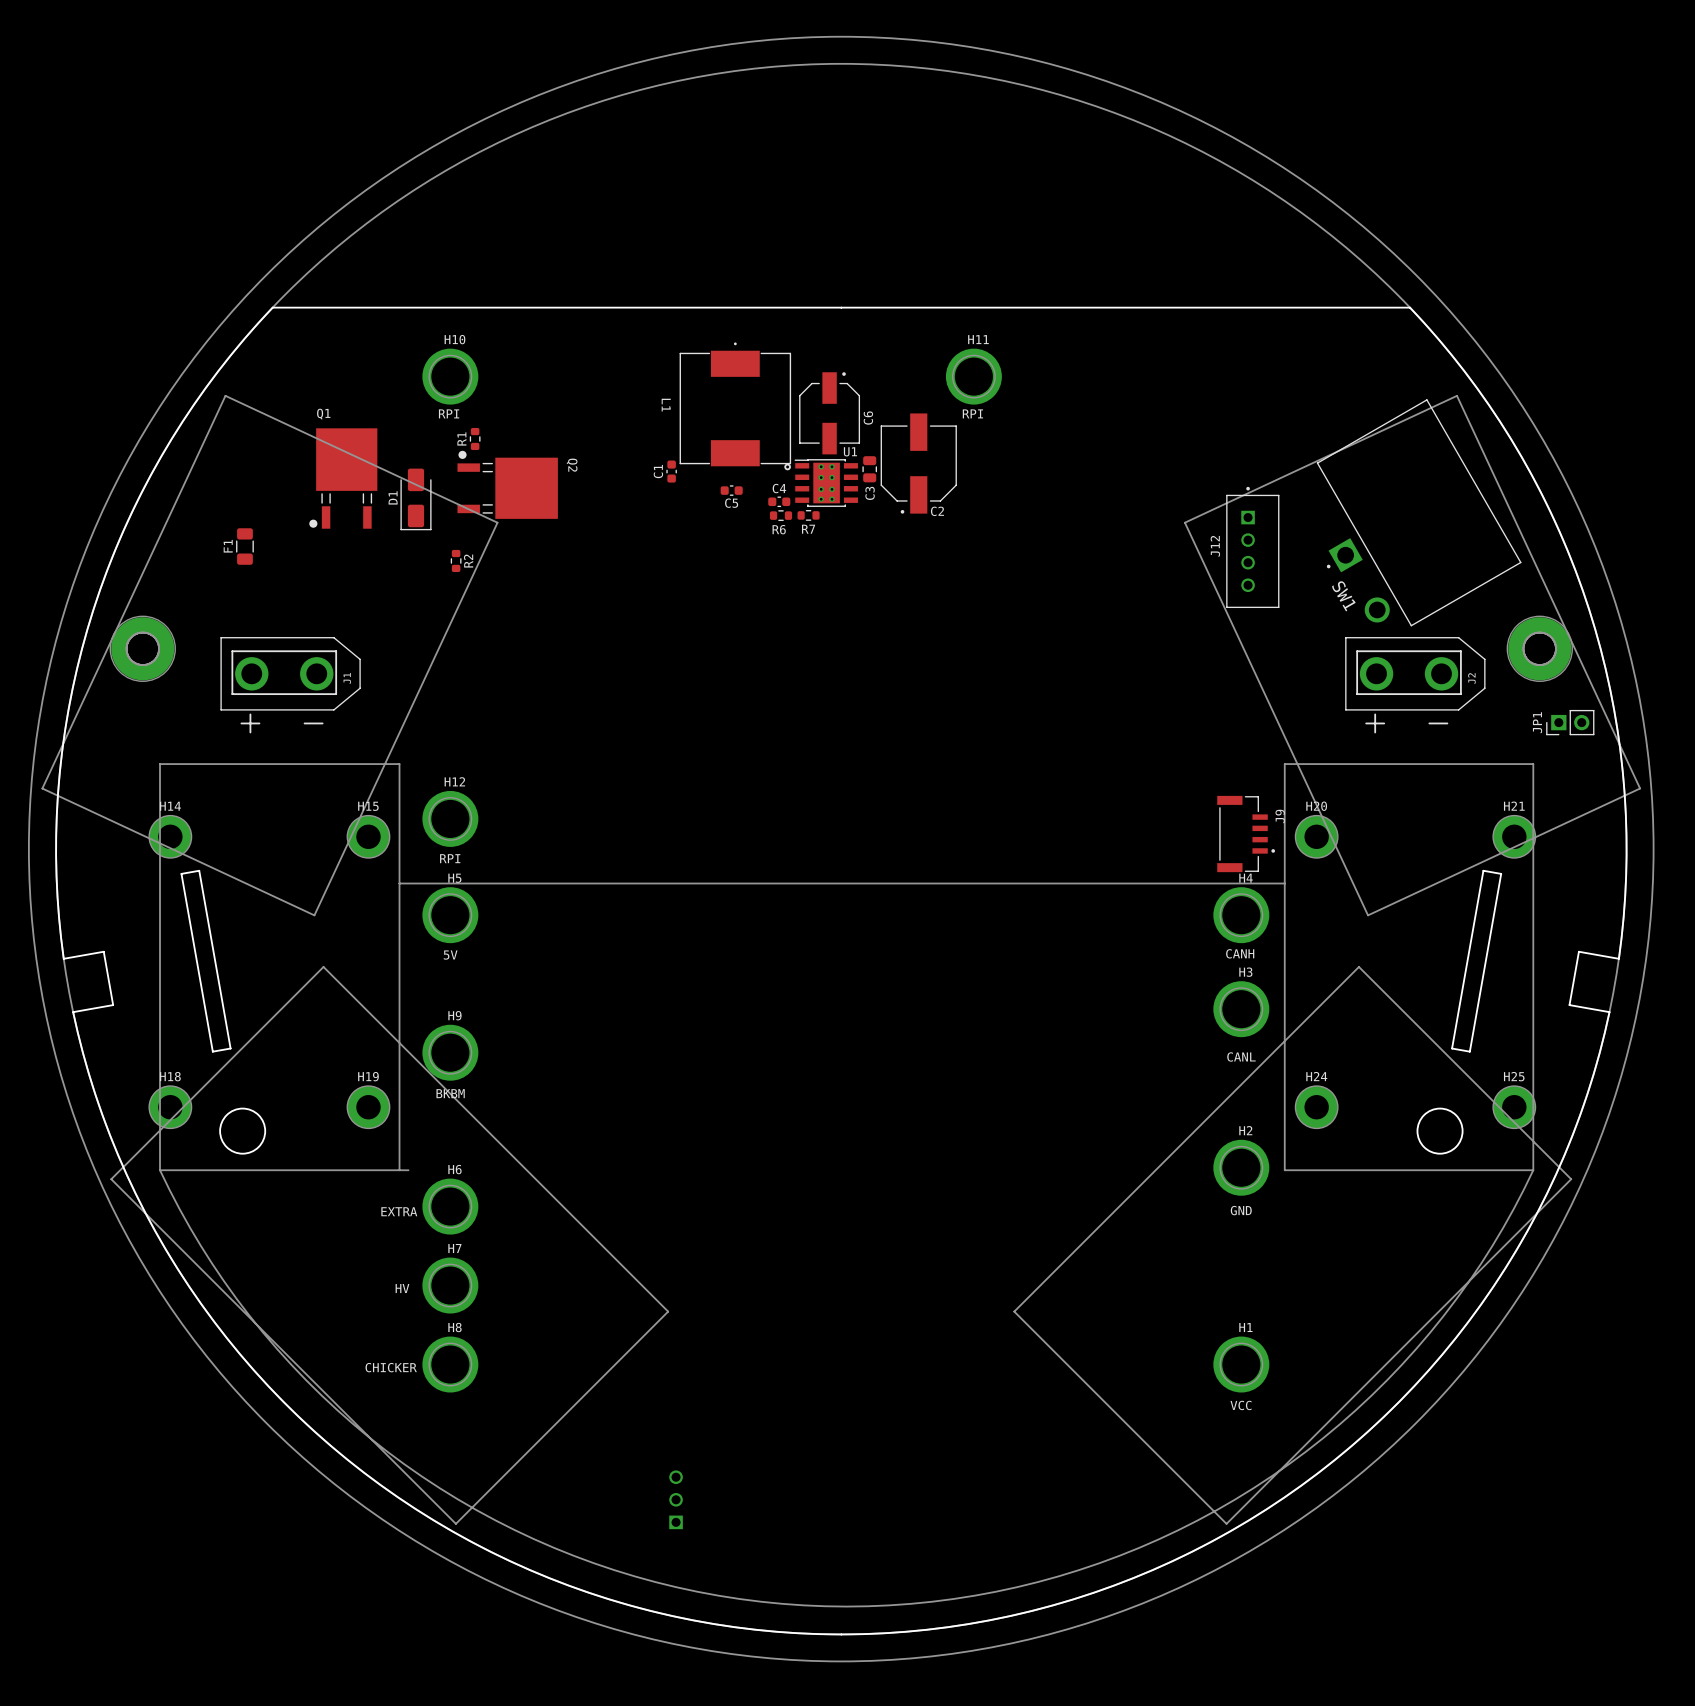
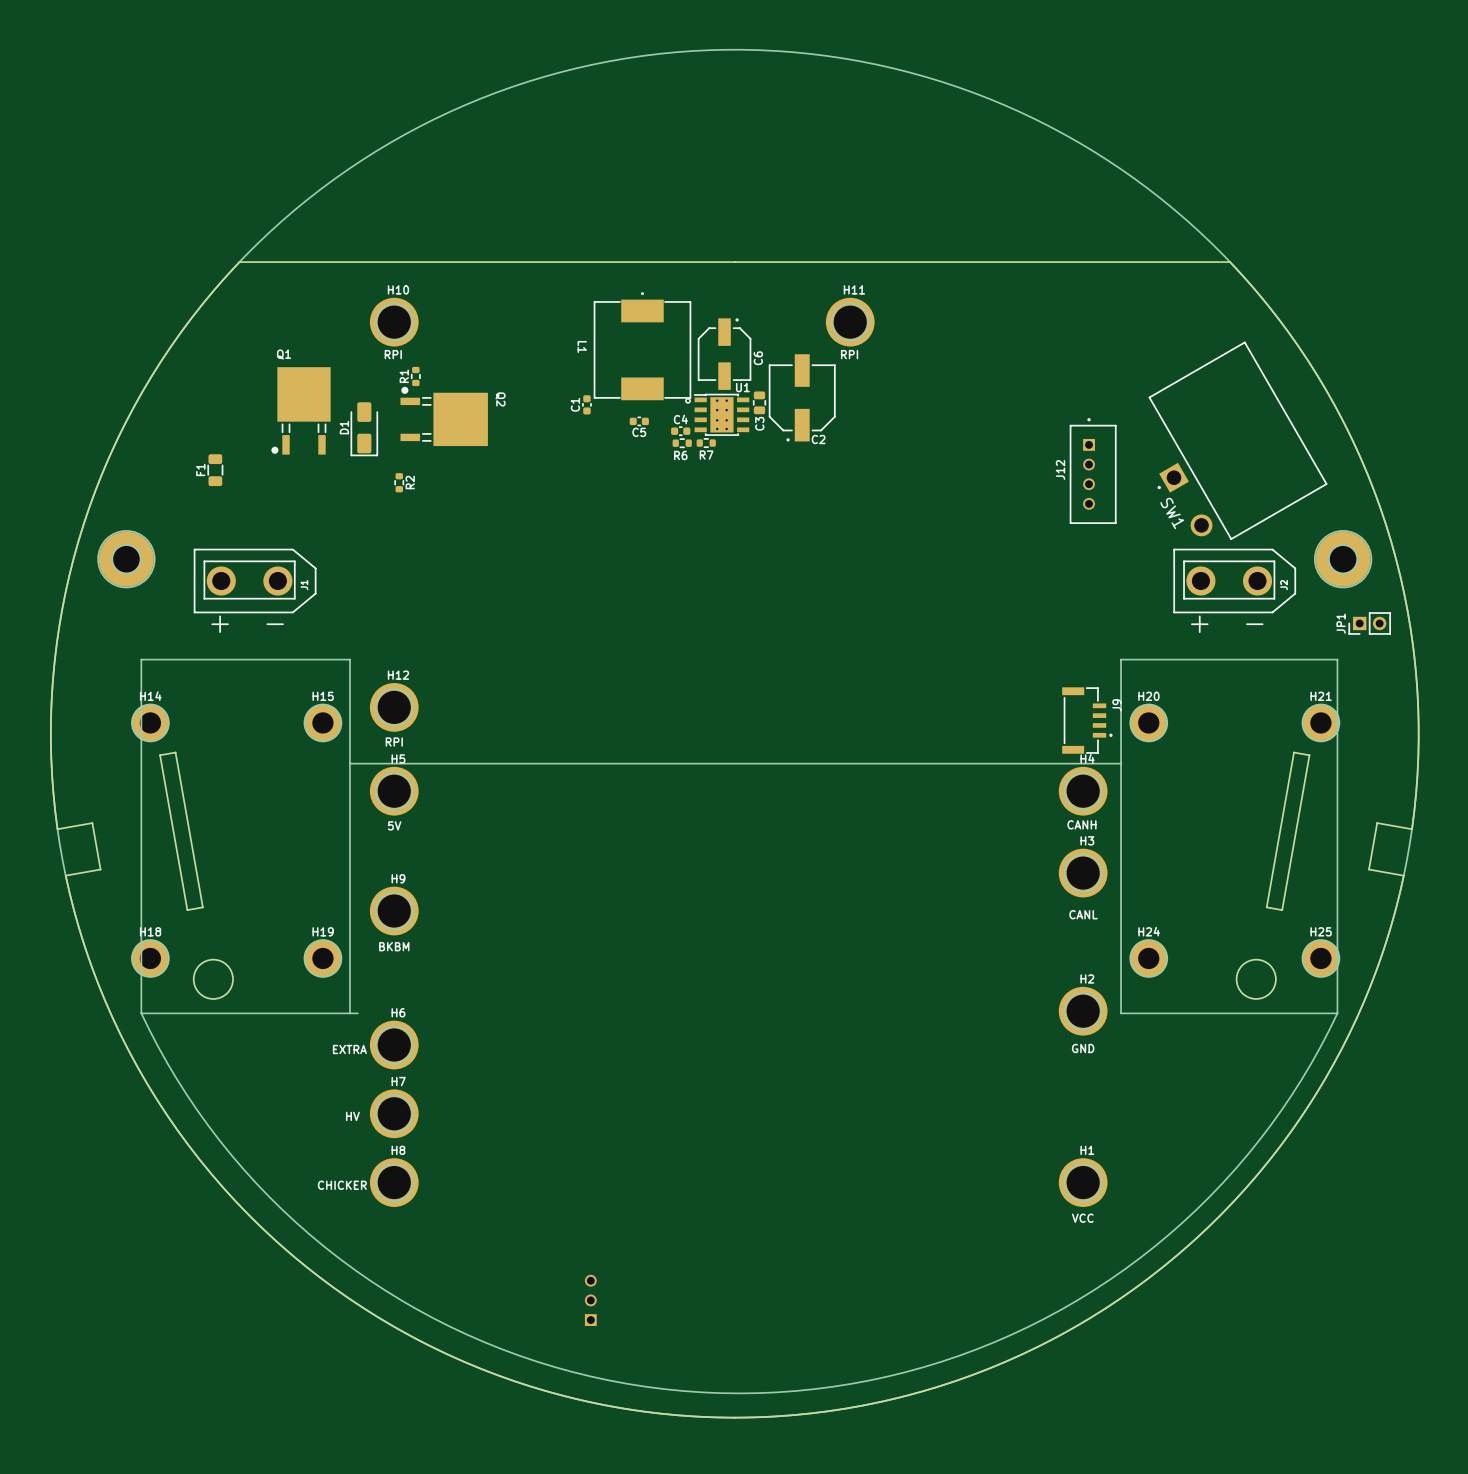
drawing: [27, 35, 1655, 1663] -> none
line: (225, 395) (42, 788) (314, 915) (497, 522) (225, 395) -> none
line: (1456, 395) (1184, 522) (1368, 915) (1640, 788) (1456, 395) -> none
line: (323, 966) (111, 1179) (455, 1523) (668, 1311) (323, 966) -> none
line: (1358, 966) (1571, 1179) (1226, 1523) (1014, 1311) (1358, 966) -> none

